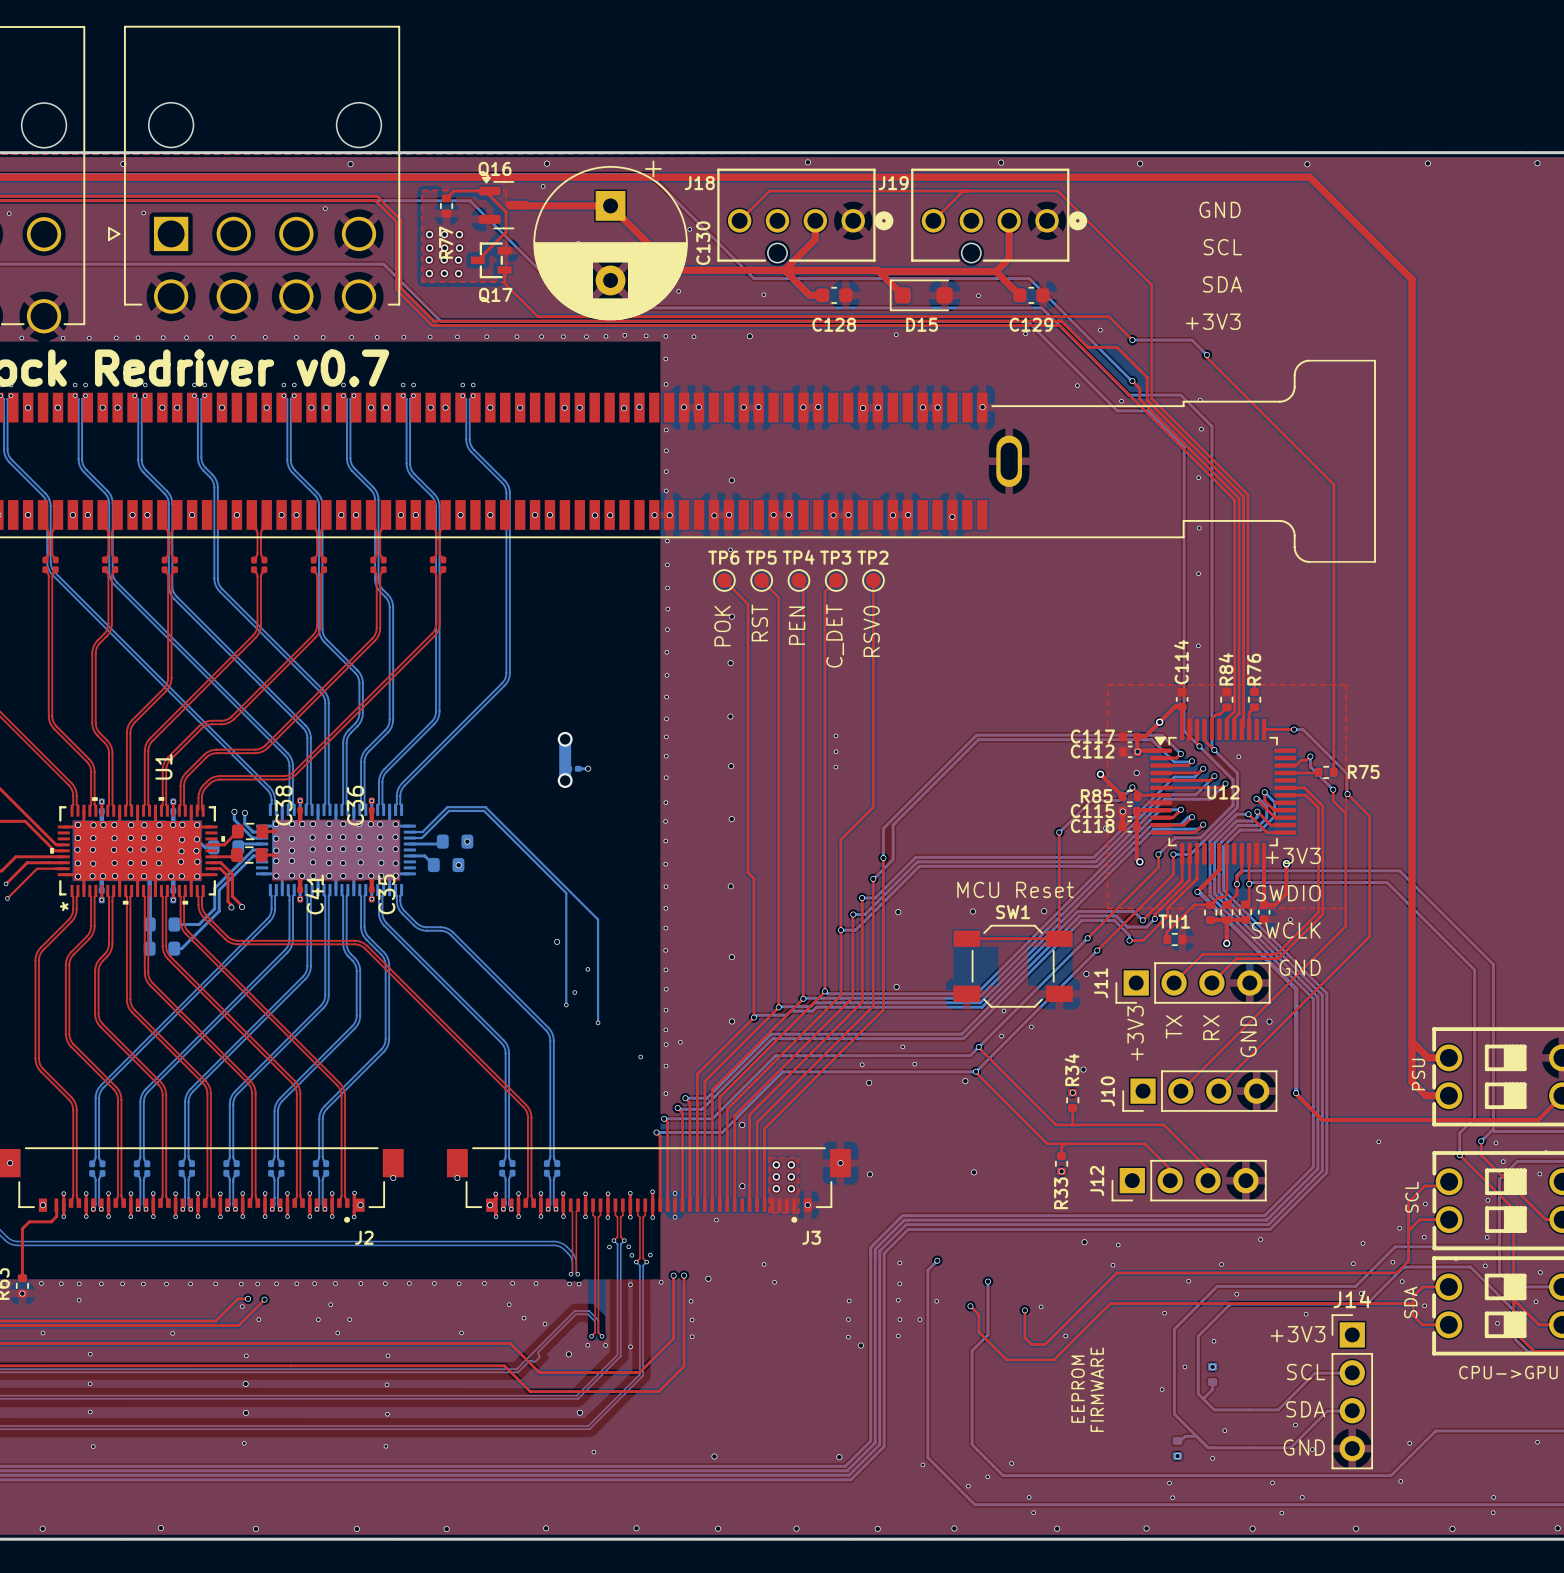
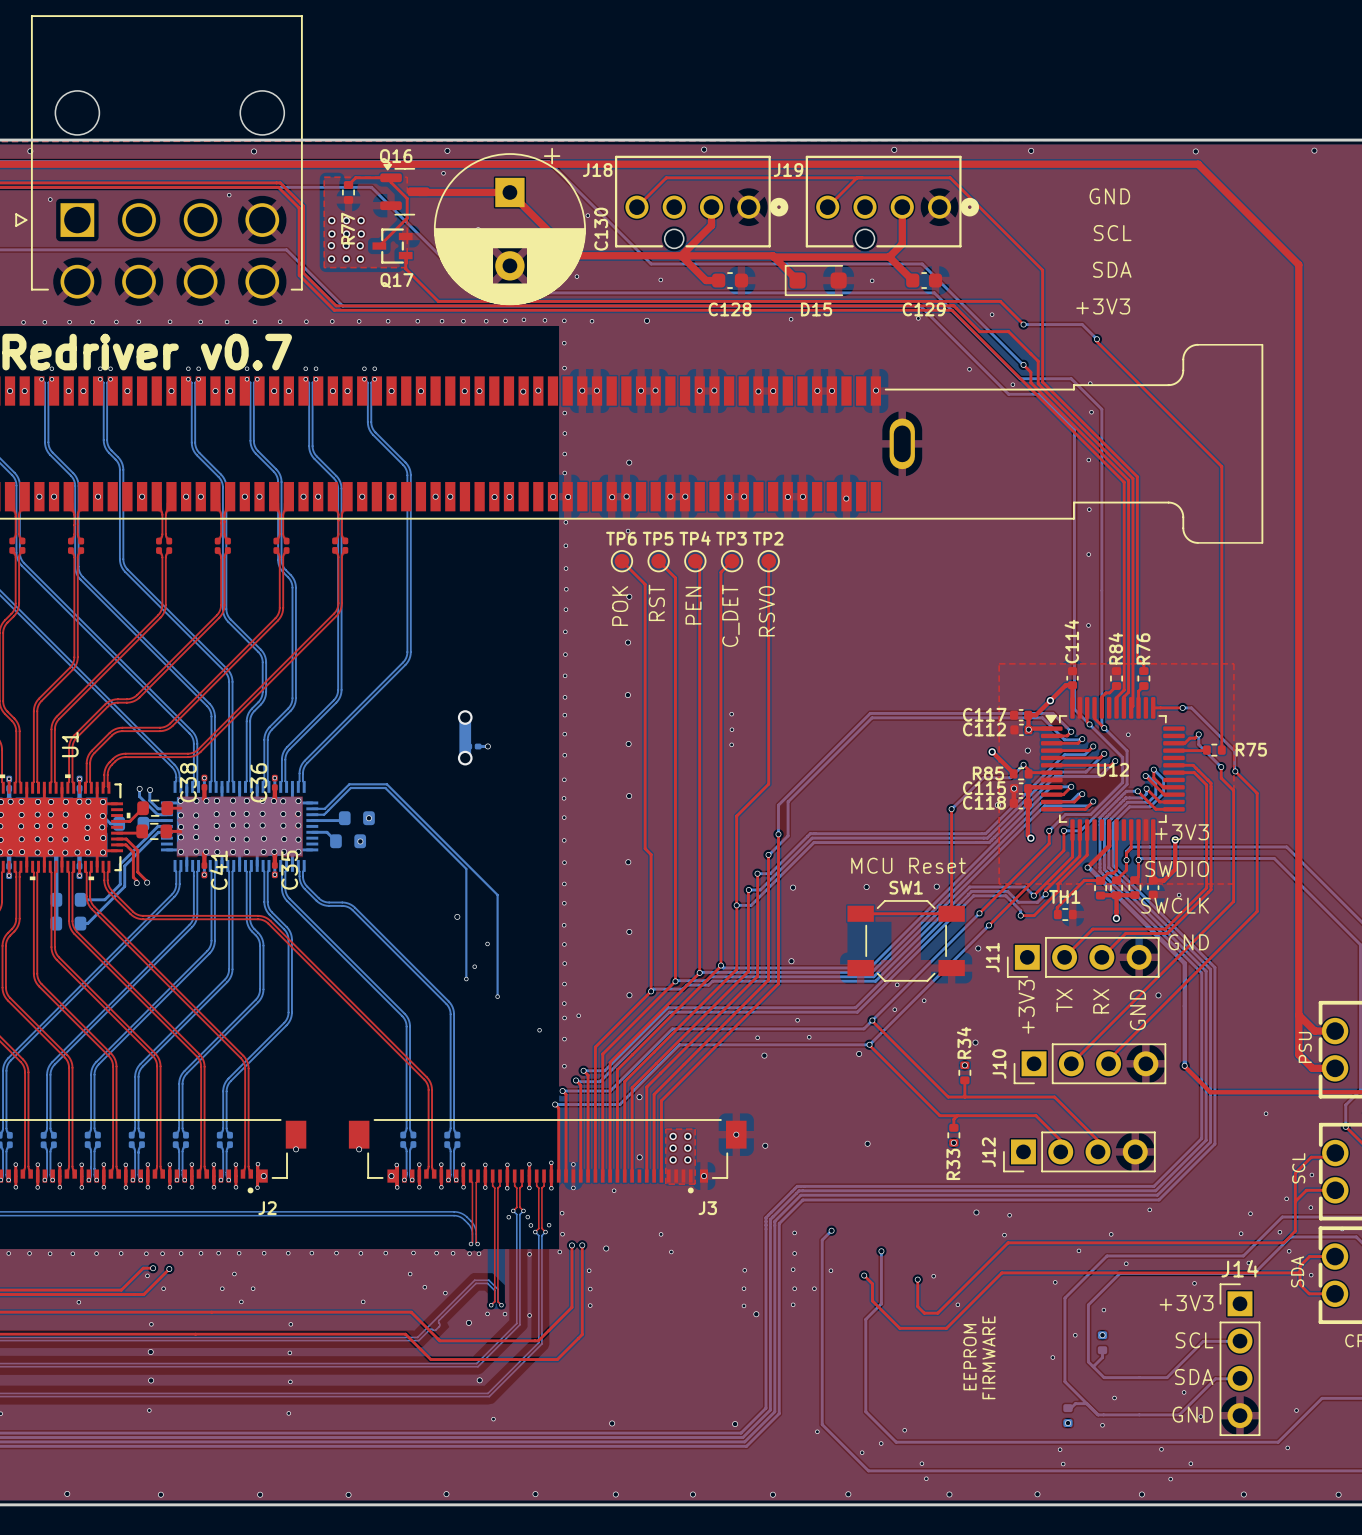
via: none -> (562, 1213)
via: none -> (562, 1234)
via: none -> (453, 1253)

